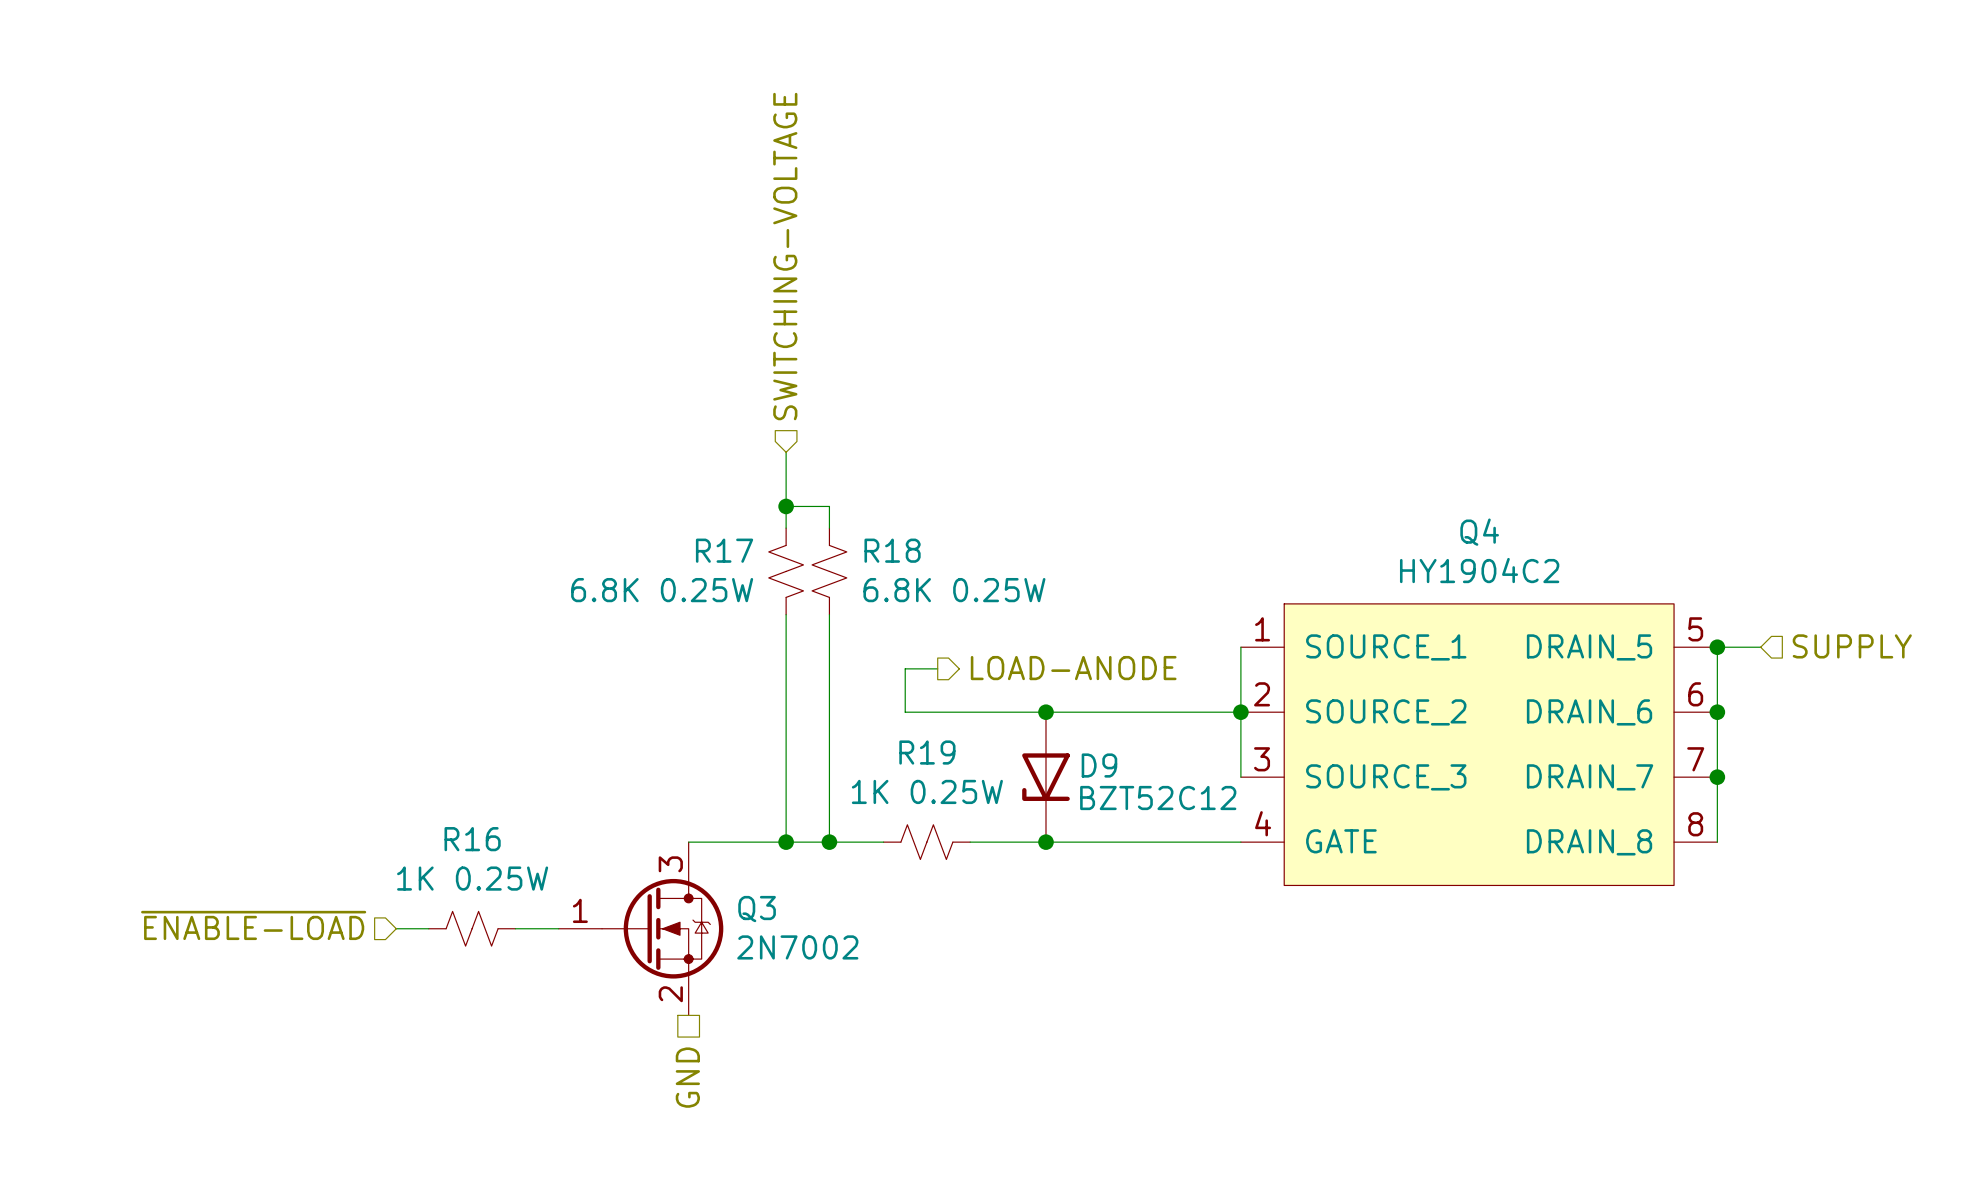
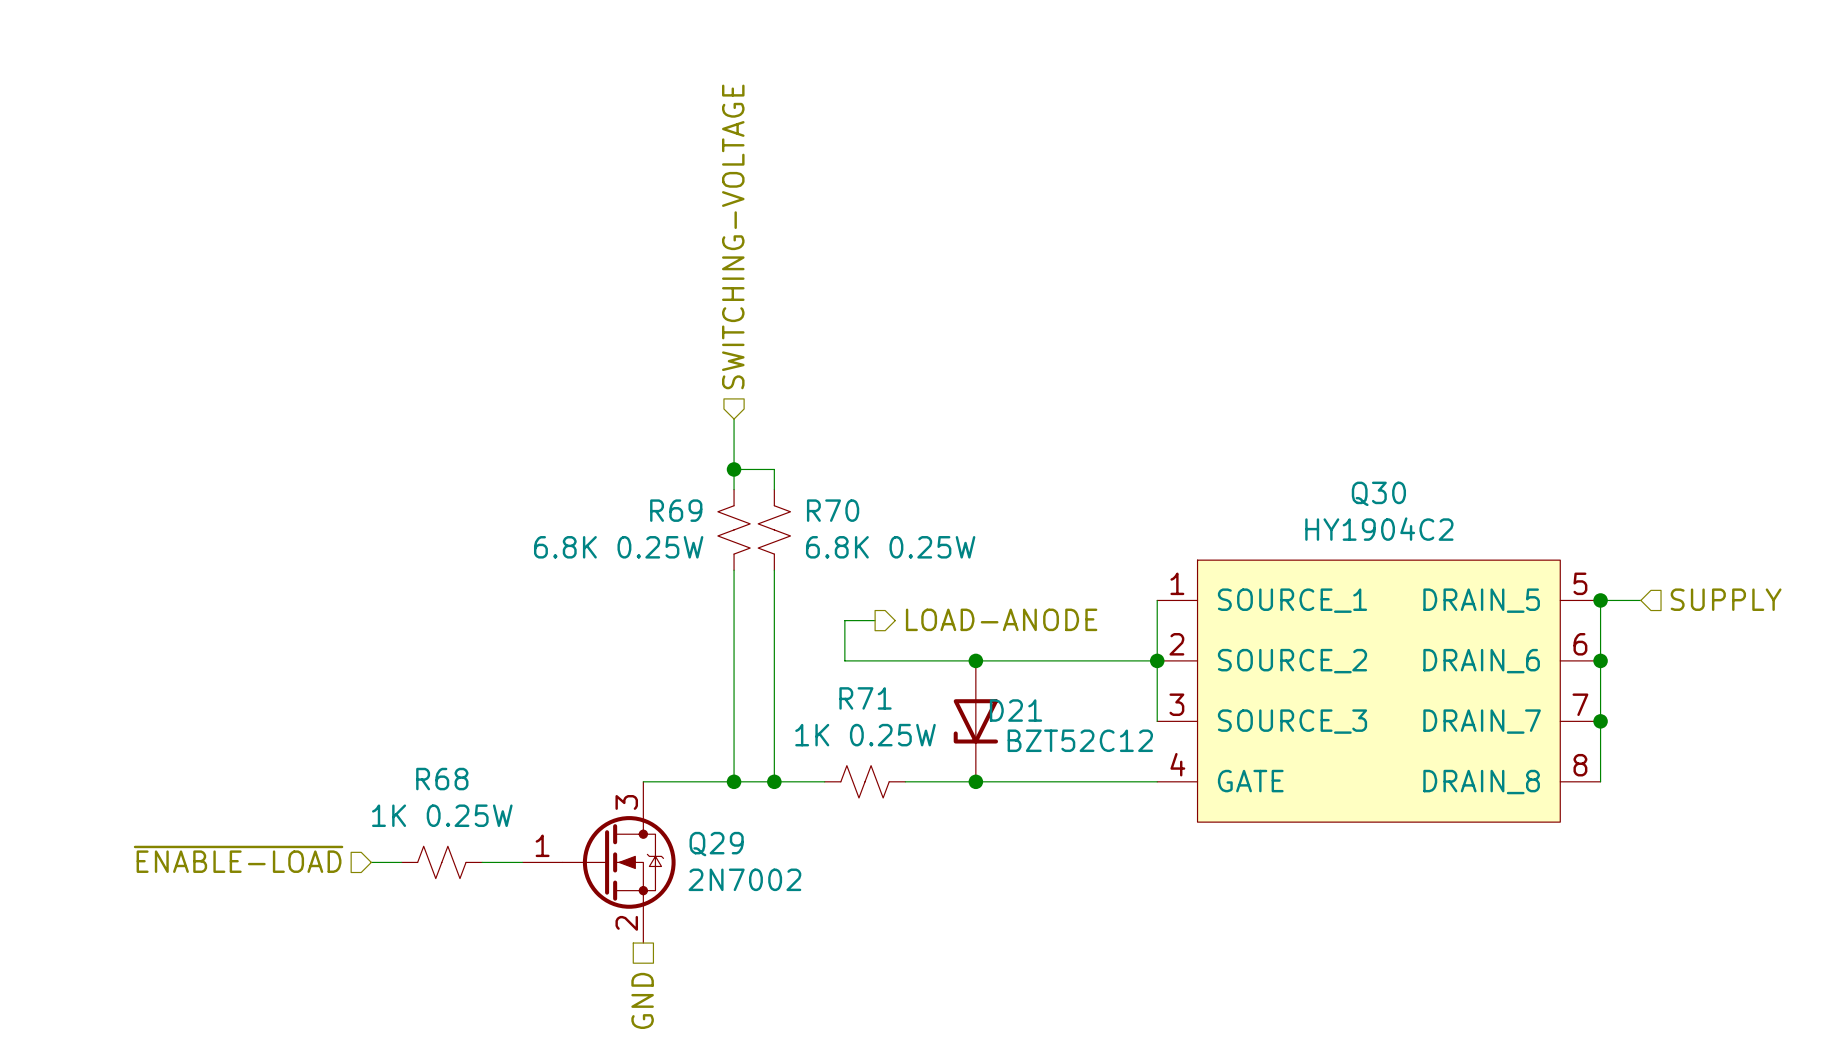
Q4 name: Q4 (1479, 532) -> Q30 (1378, 493)
R17 name: R17 (724, 550) -> R69 (676, 510)
R18 name: R18 (892, 550) -> R70 (833, 510)
R19 name: R19 (927, 752) -> R71 (865, 698)
D9 name: D9 (1099, 765) -> D21 (1016, 710)
R16 name: R16 (472, 839) -> R68 (442, 779)
Q3 name: Q3 (757, 909) -> Q29 (716, 844)

